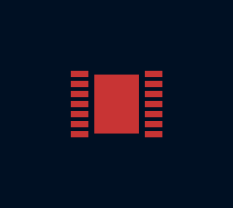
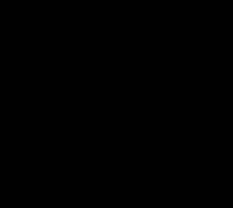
part: (116, 104) -> none

